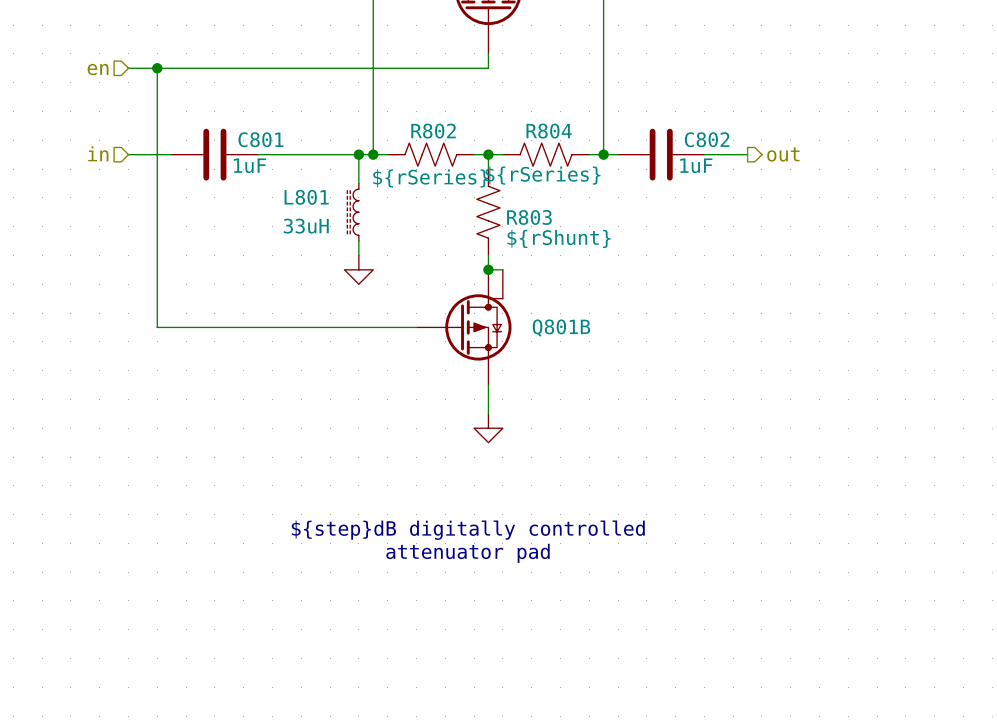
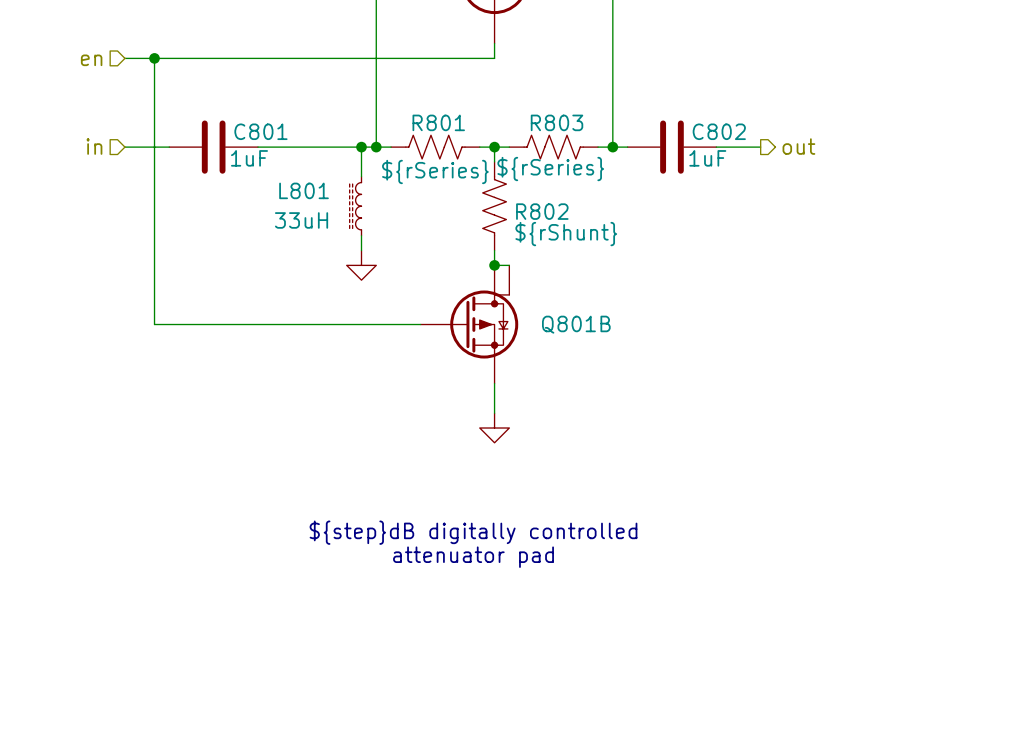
R802 name: R802 (433, 131) -> R801 (438, 122)
R804 name: R804 (549, 131) -> R803 (557, 122)
R803 name: R803 (529, 217) -> R802 (542, 211)

